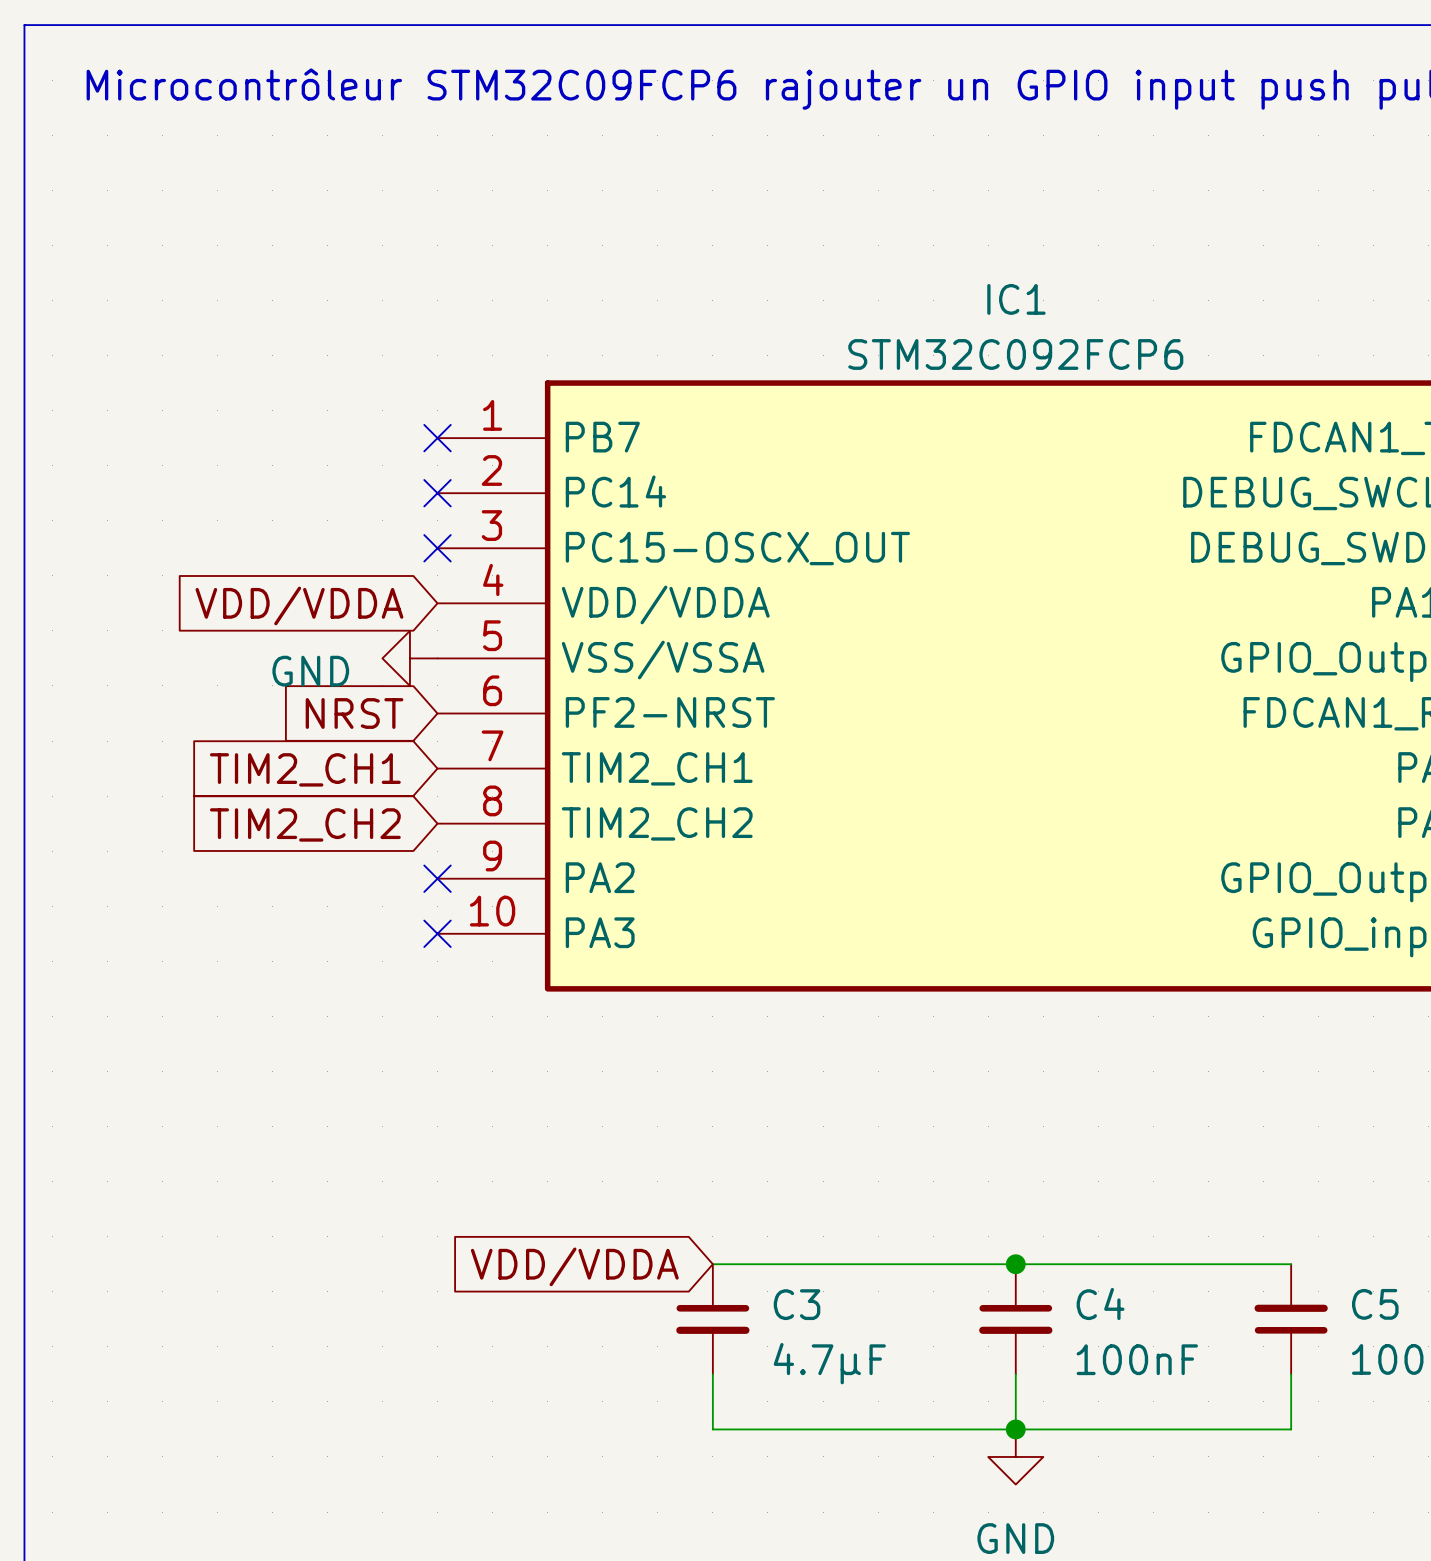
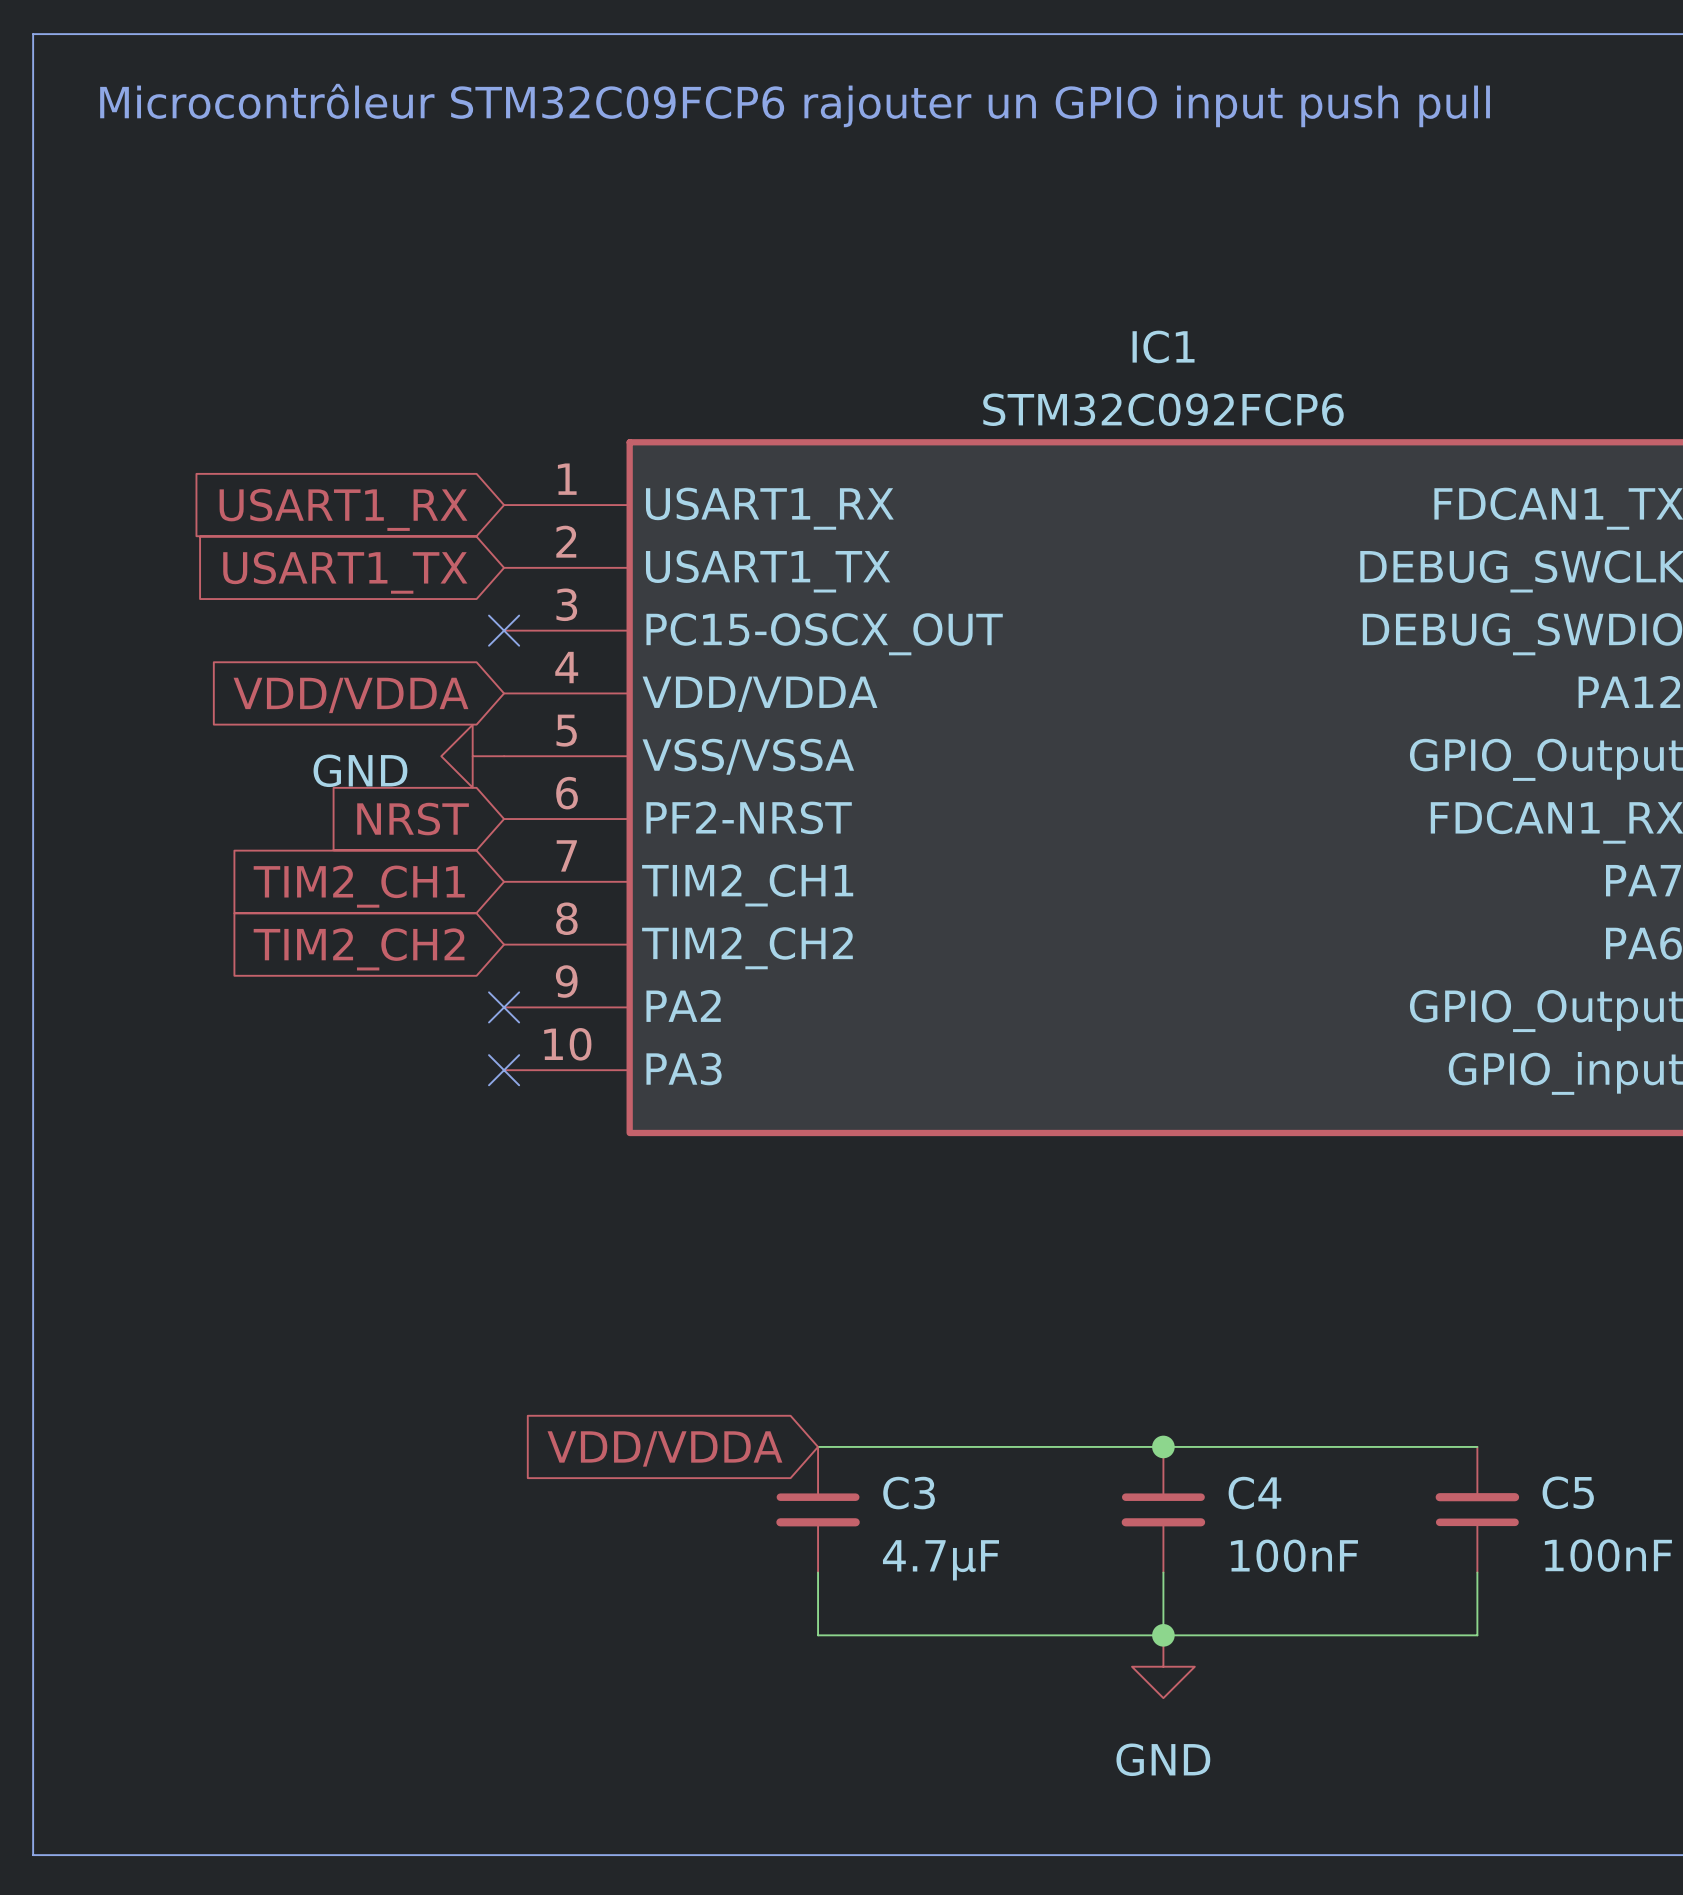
IC1 pin name: PB7 (602, 437) -> USART1_RX (769, 508)
no-connect mark: (437, 438) -> none
global label: none -> USART1_RX (343, 509)
IC1 pin name: PC14 (615, 491) -> USART1_TX (768, 571)
no-connect mark: (437, 493) -> none
global label: none -> USART1_TX (345, 572)

